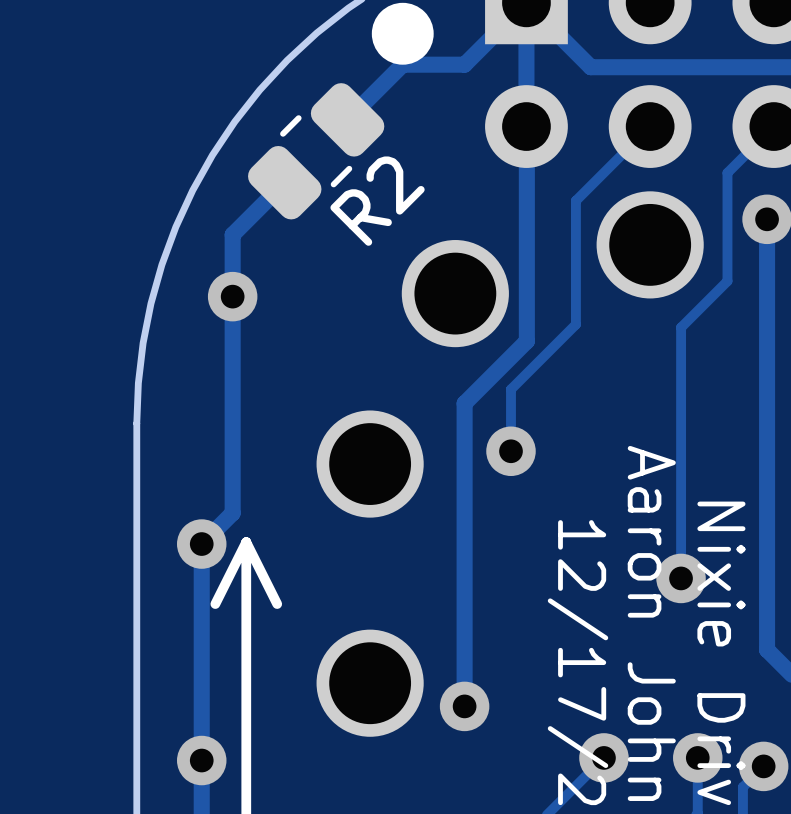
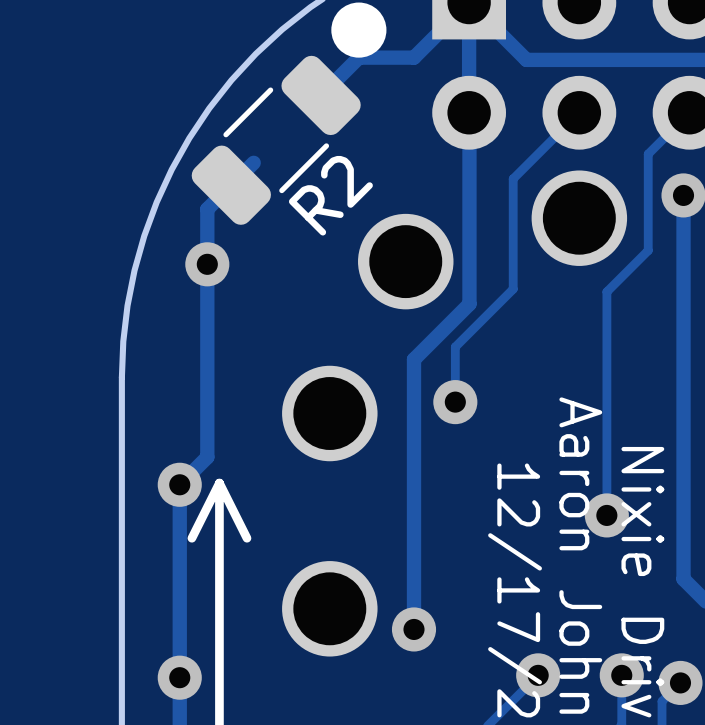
R2 footprint: [248, 83, 385, 220] -> [191, 55, 361, 225]
R2 name position: R2 (377, 201) -> R2 (330, 195)

